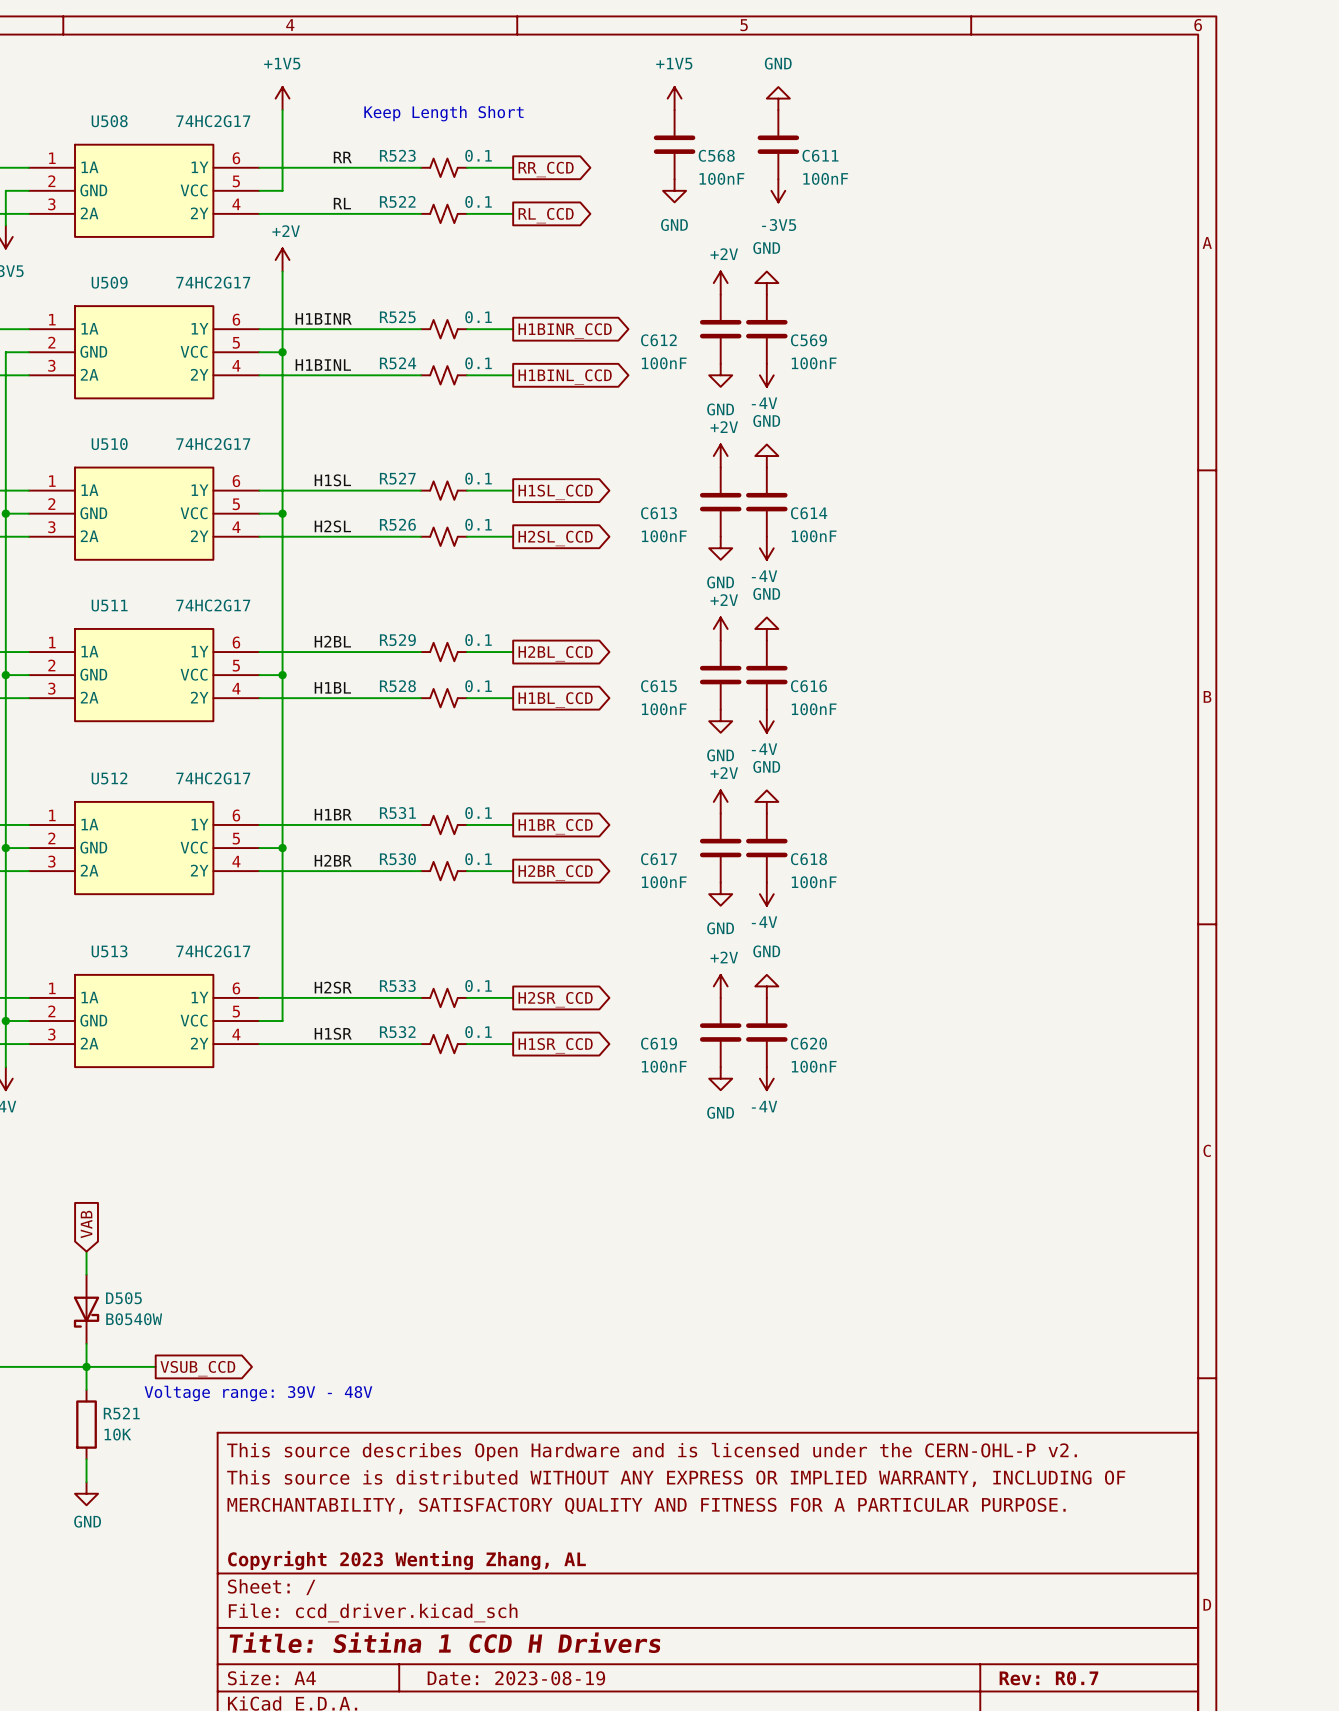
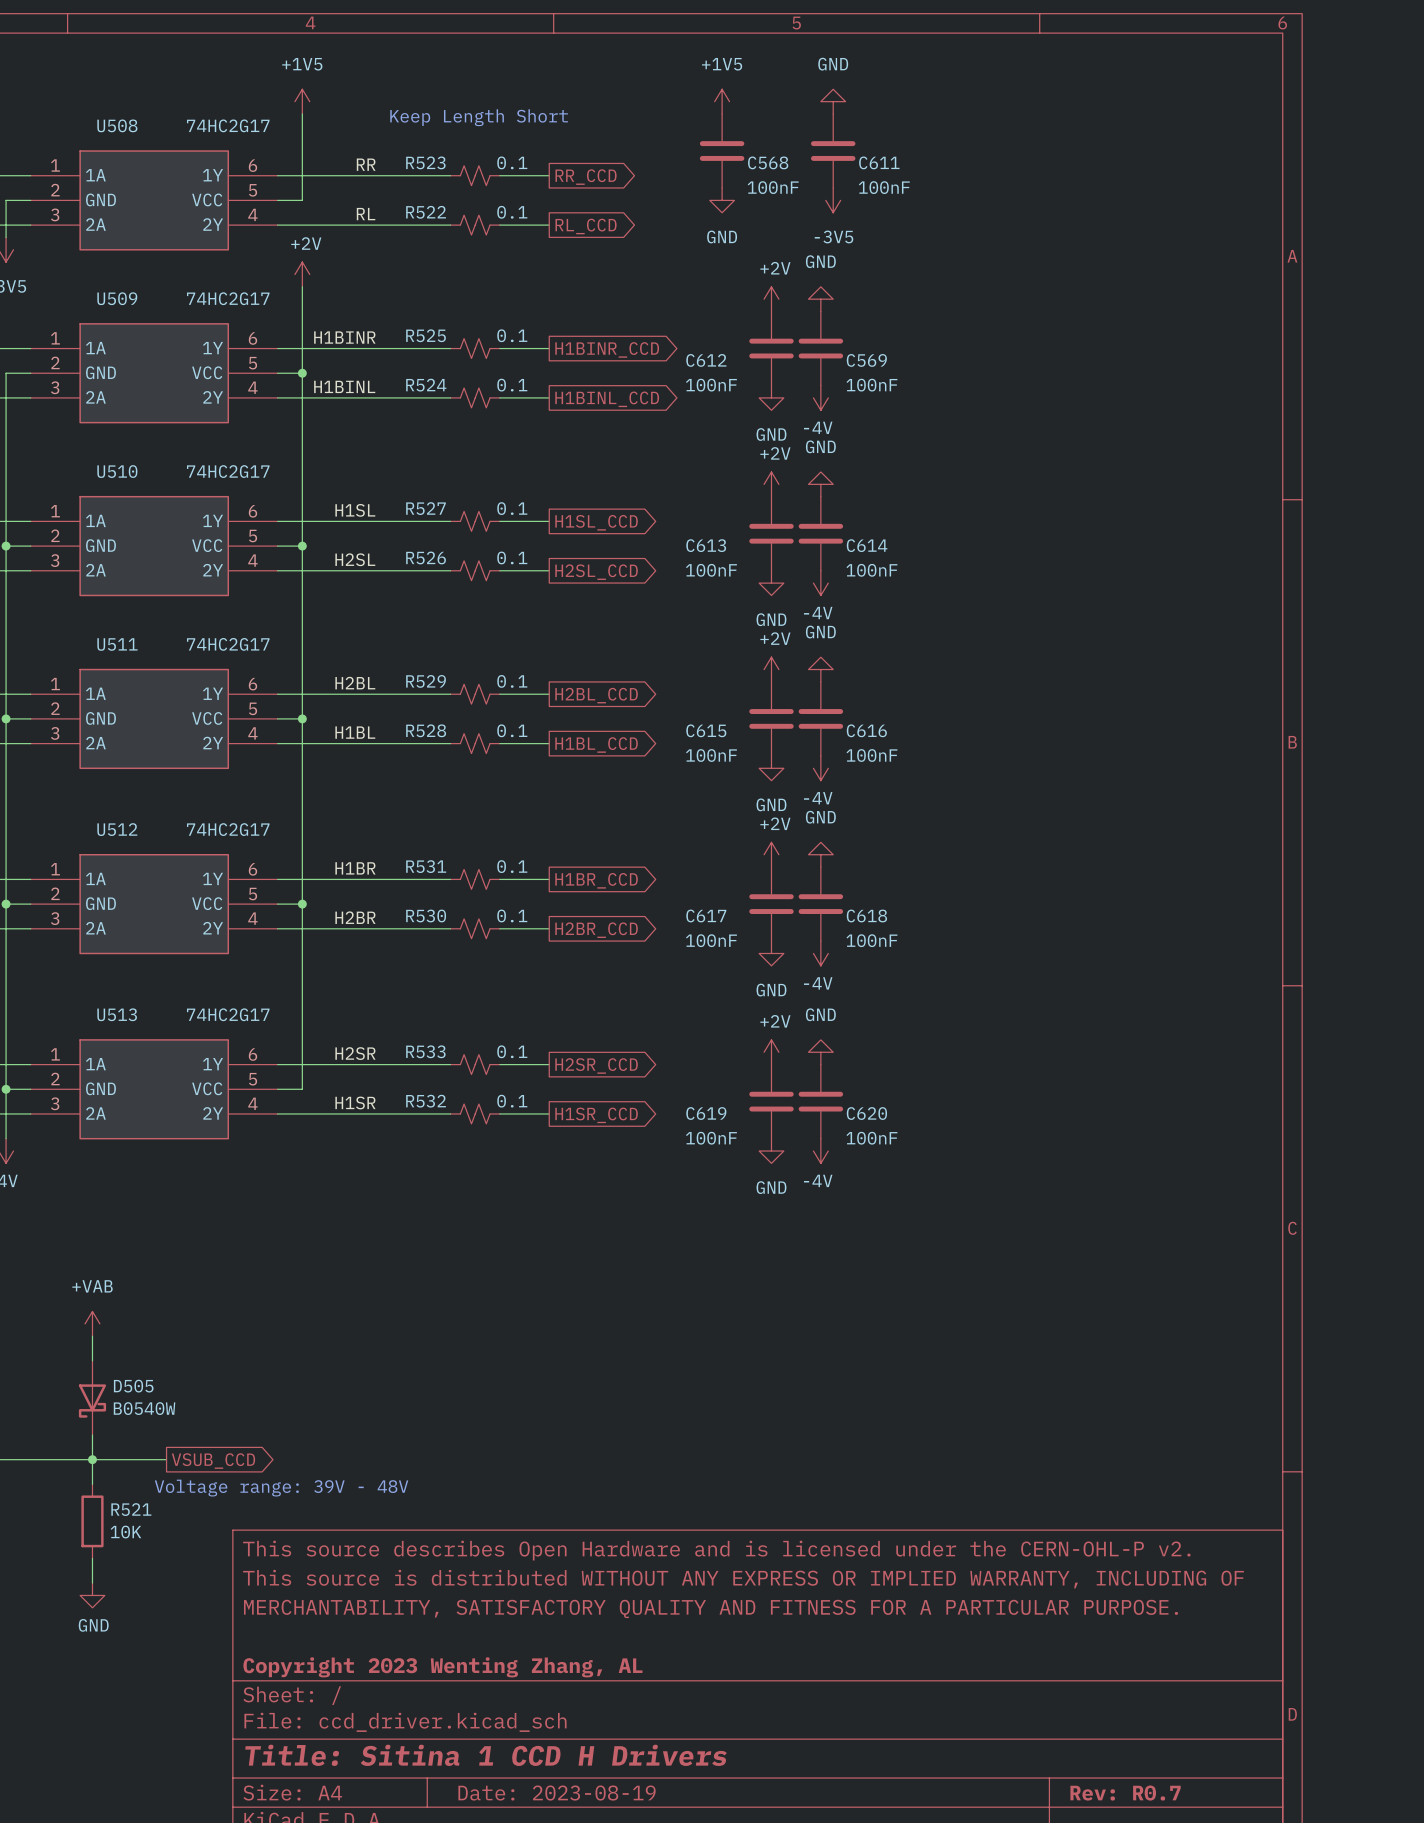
global label: VAB (86, 1224) -> none
power symbol: none -> +VAB (92, 1323)

